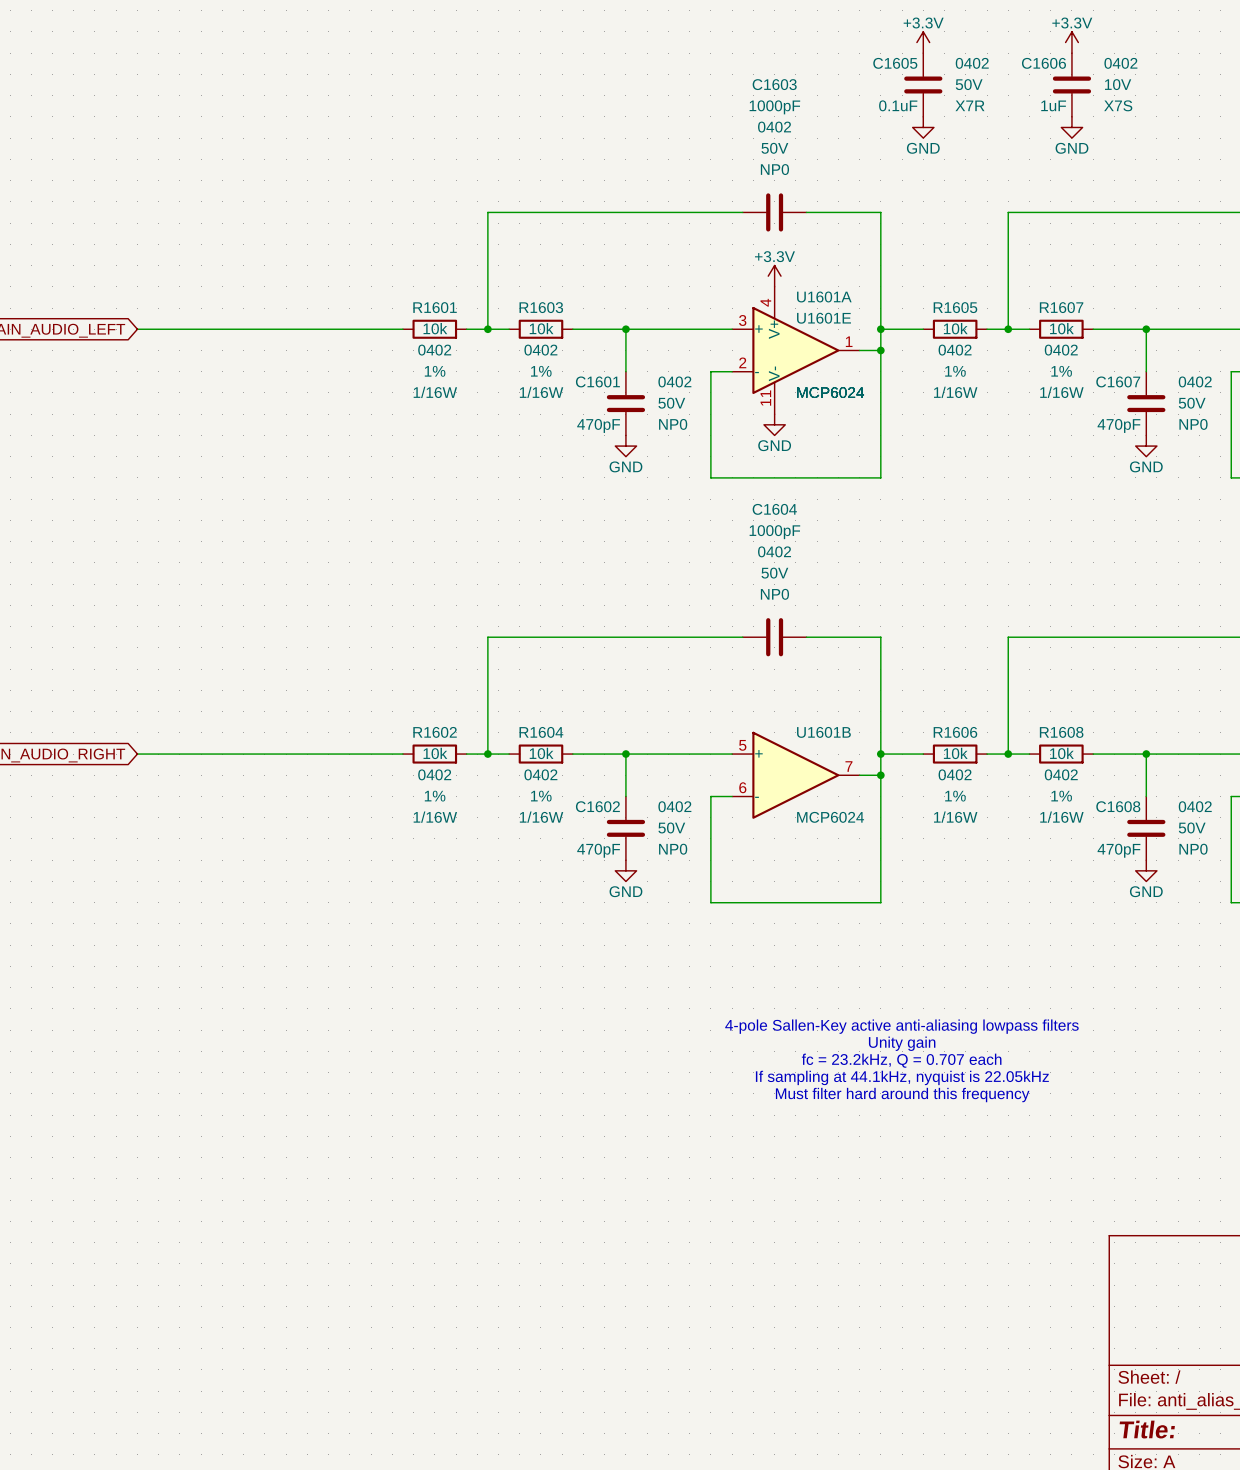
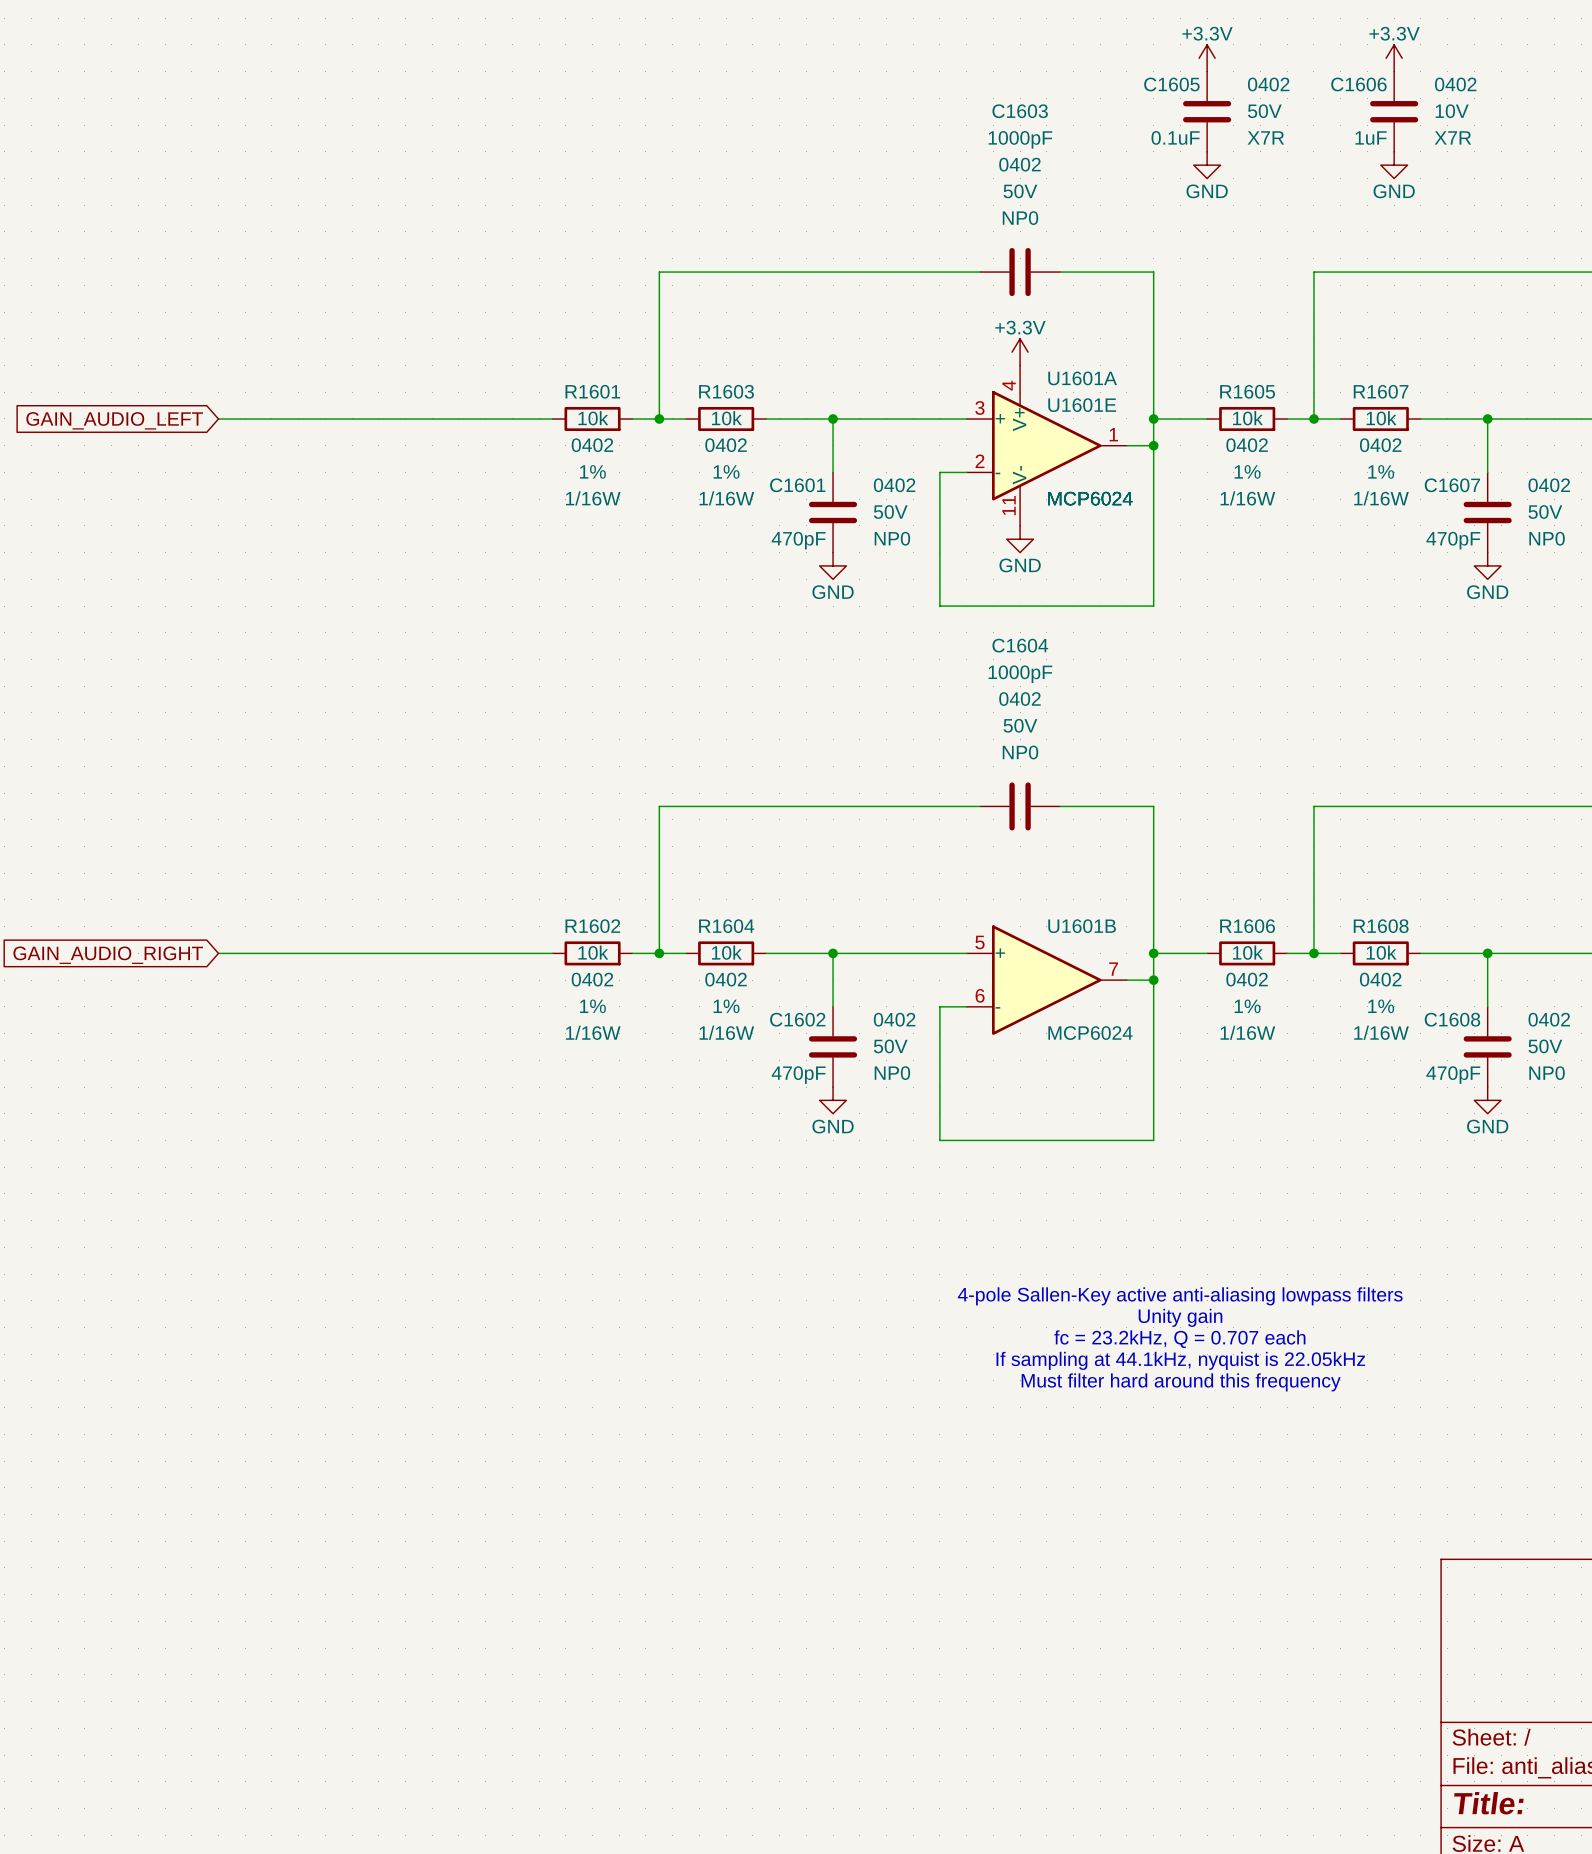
C1606 text: X7S (1118, 105) -> X7R (1452, 137)

